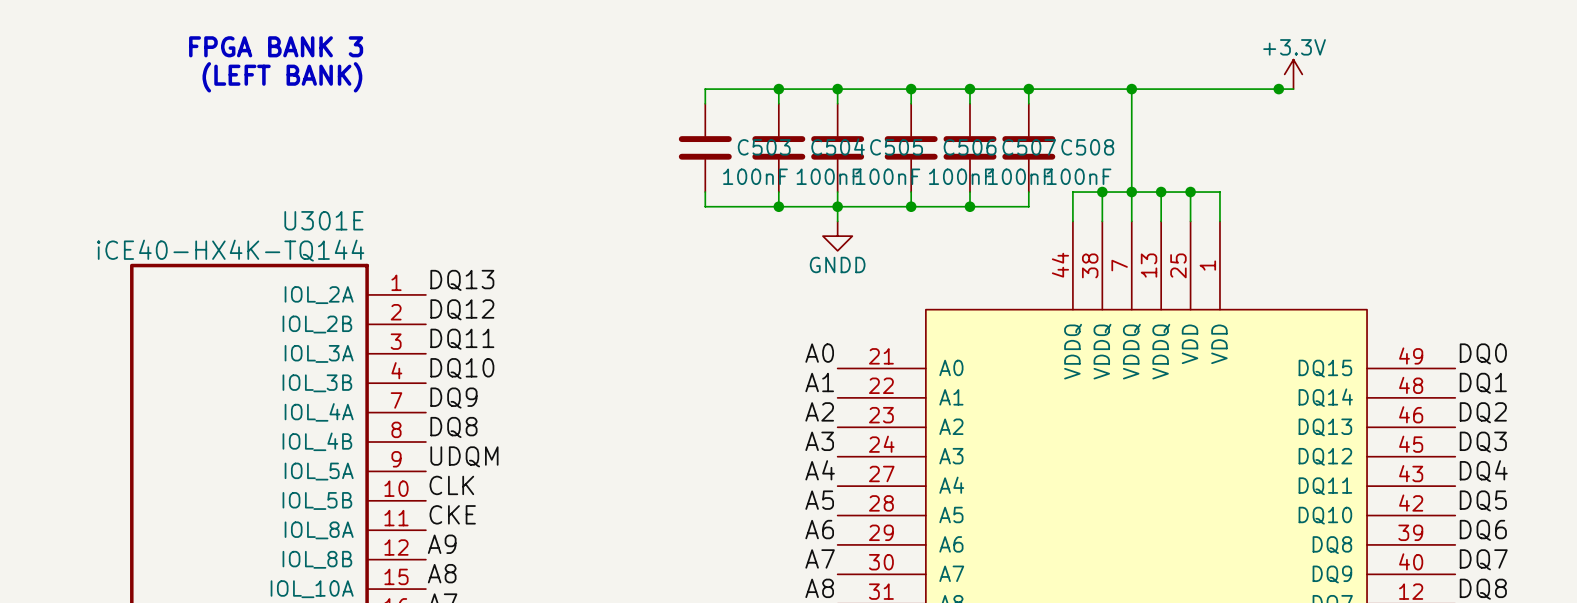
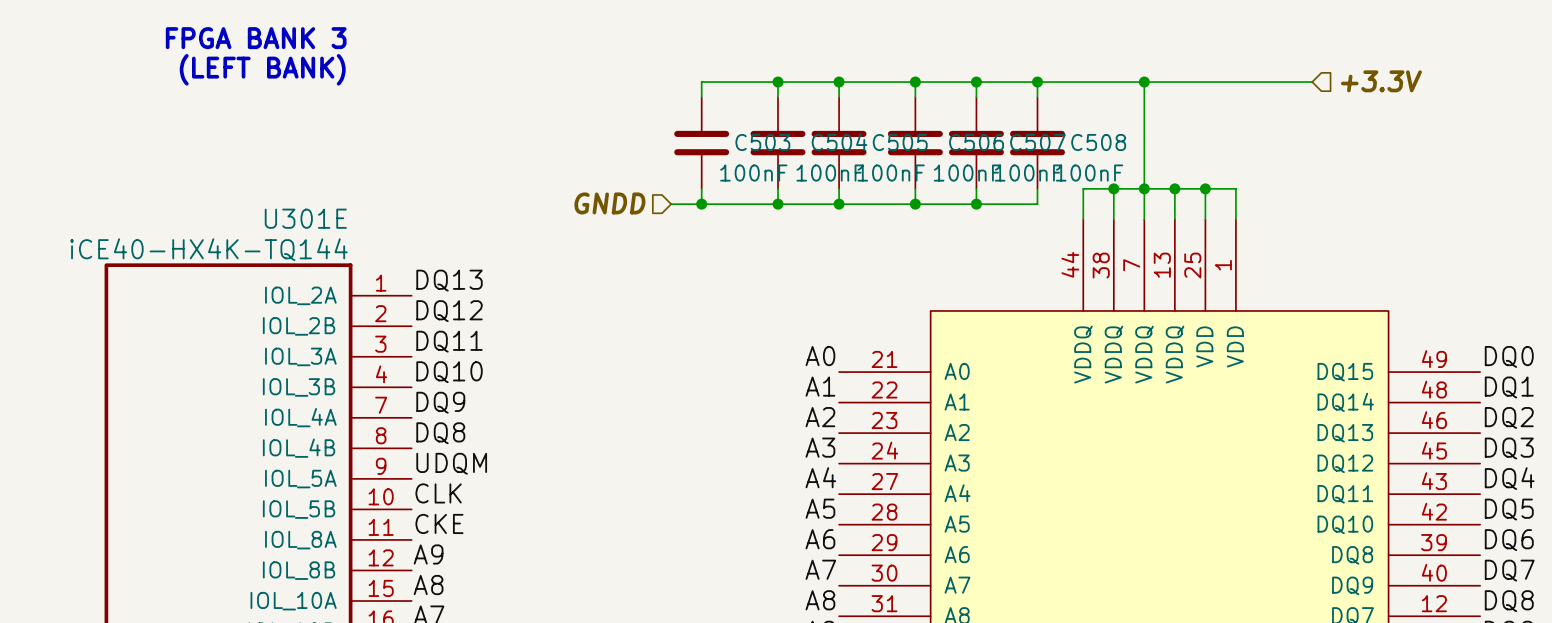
power symbol: +3.3V (1293, 74) -> none
hierarchical label: none -> +3.3V (1381, 81)
junction: (1278, 89) -> none
hierarchical label: none -> GNDD (609, 203)
wire: none -> (671, 204) (701, 204)
junction: none -> (701, 204)
wire: (837, 206) (837, 221) -> none
power symbol: GNDD (837, 236) -> none

